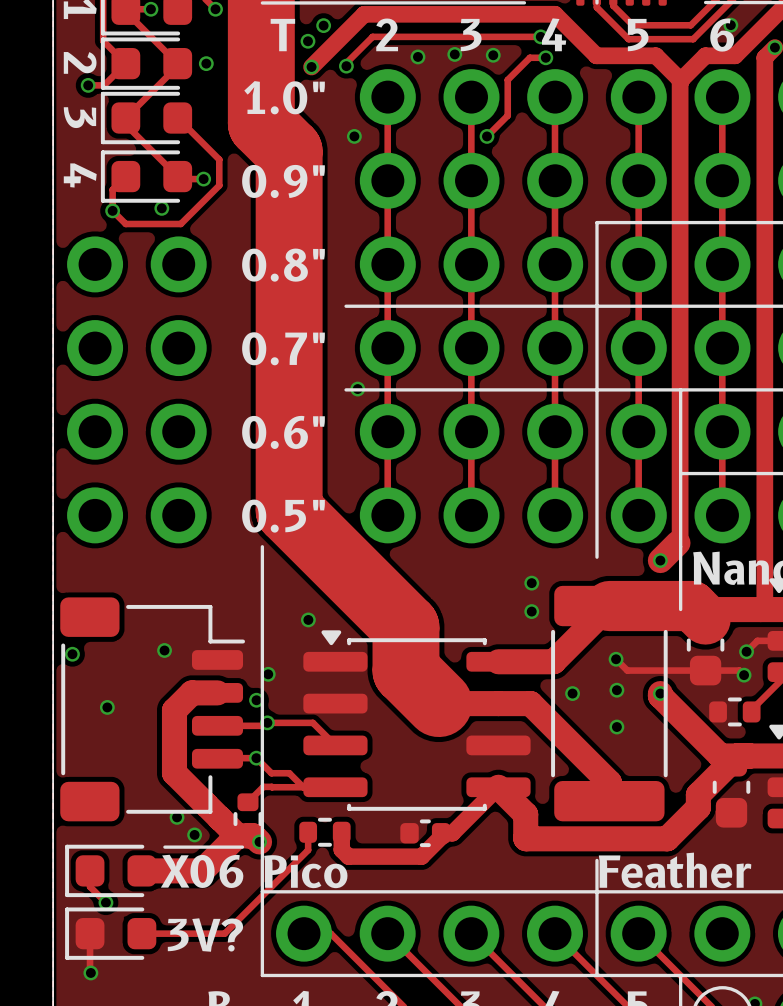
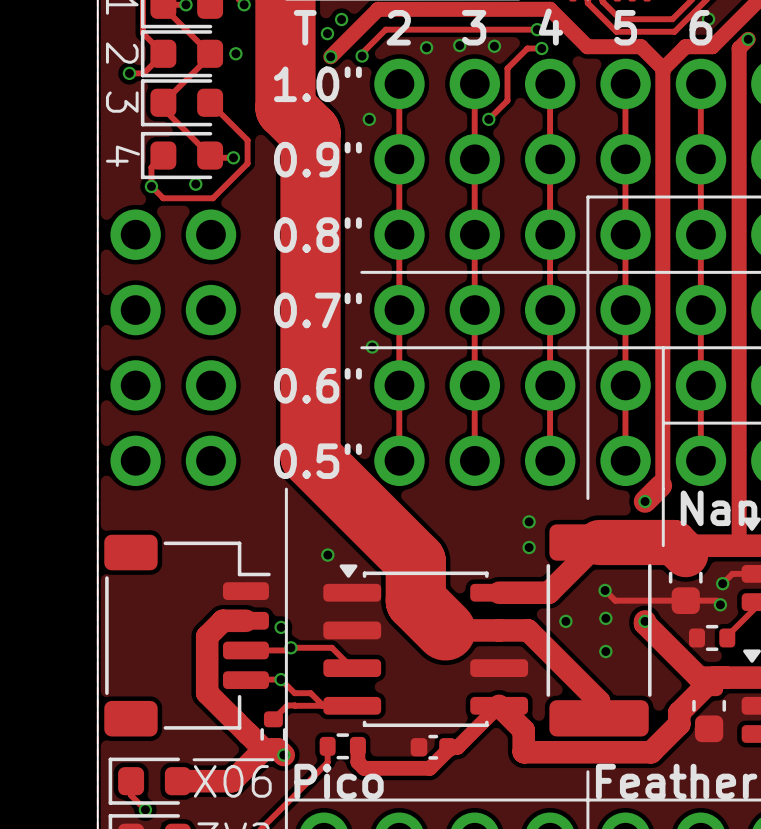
via: (164, 650) -> none
via: (72, 654) -> none
via: (268, 674) -> none
via: (107, 707) -> none
via: (177, 817) -> none
via: (194, 834) -> none

